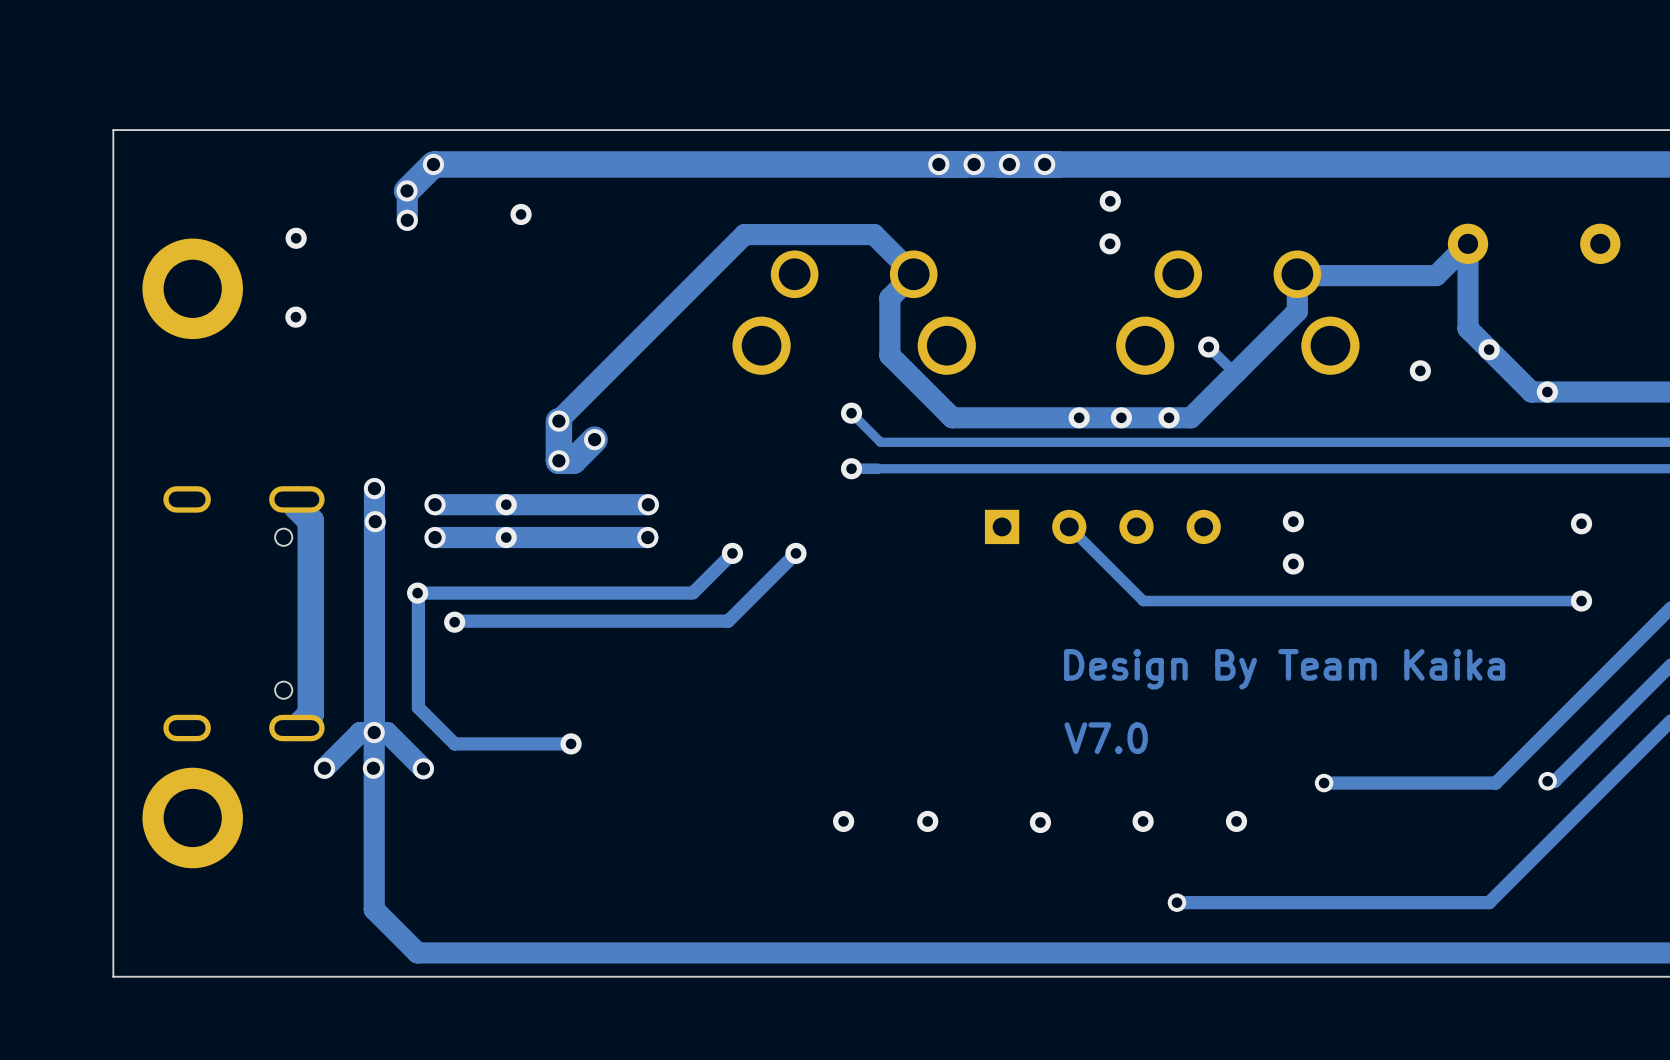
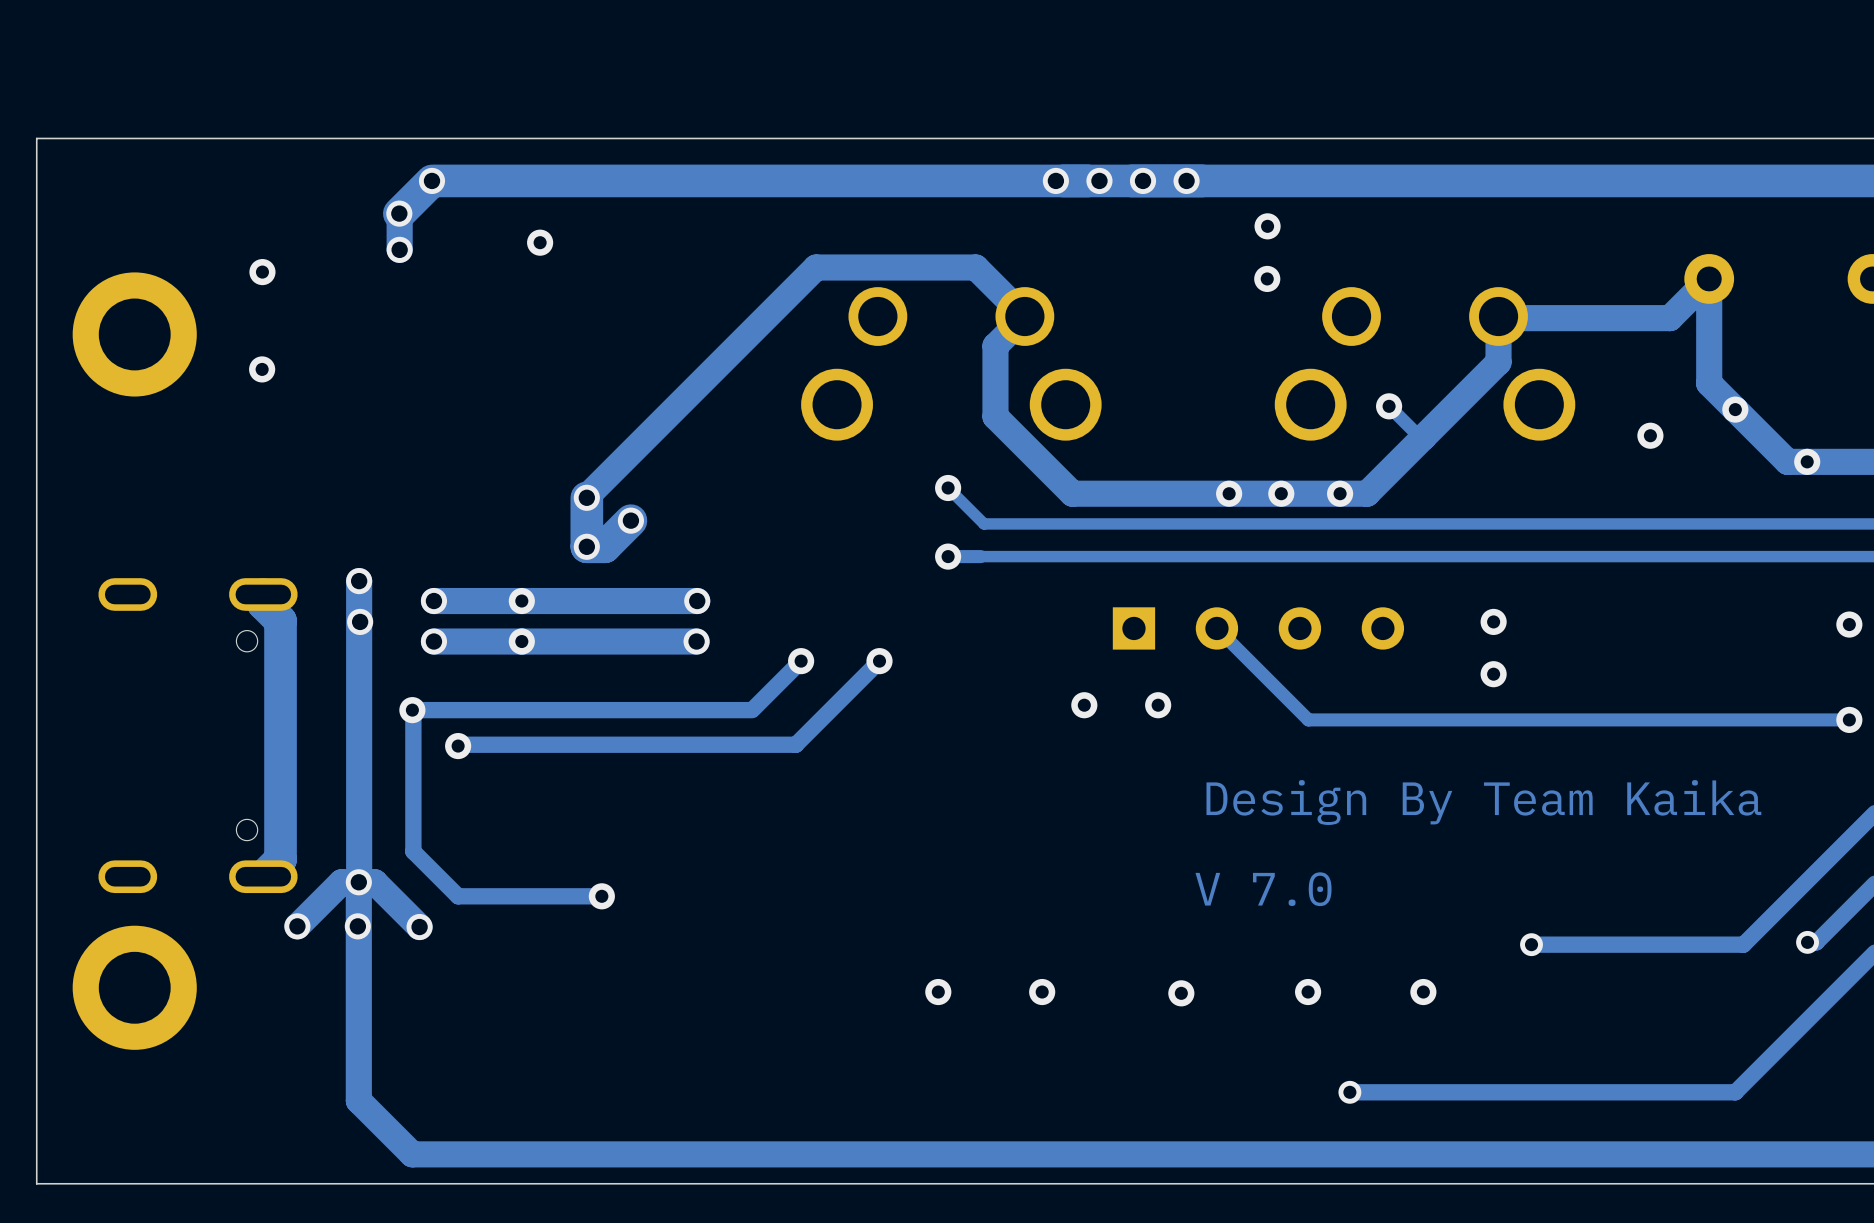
via: none -> (1084, 705)
via: none -> (1158, 705)
text: V7.0 (1106, 738) -> V 7.0 (1263, 889)

